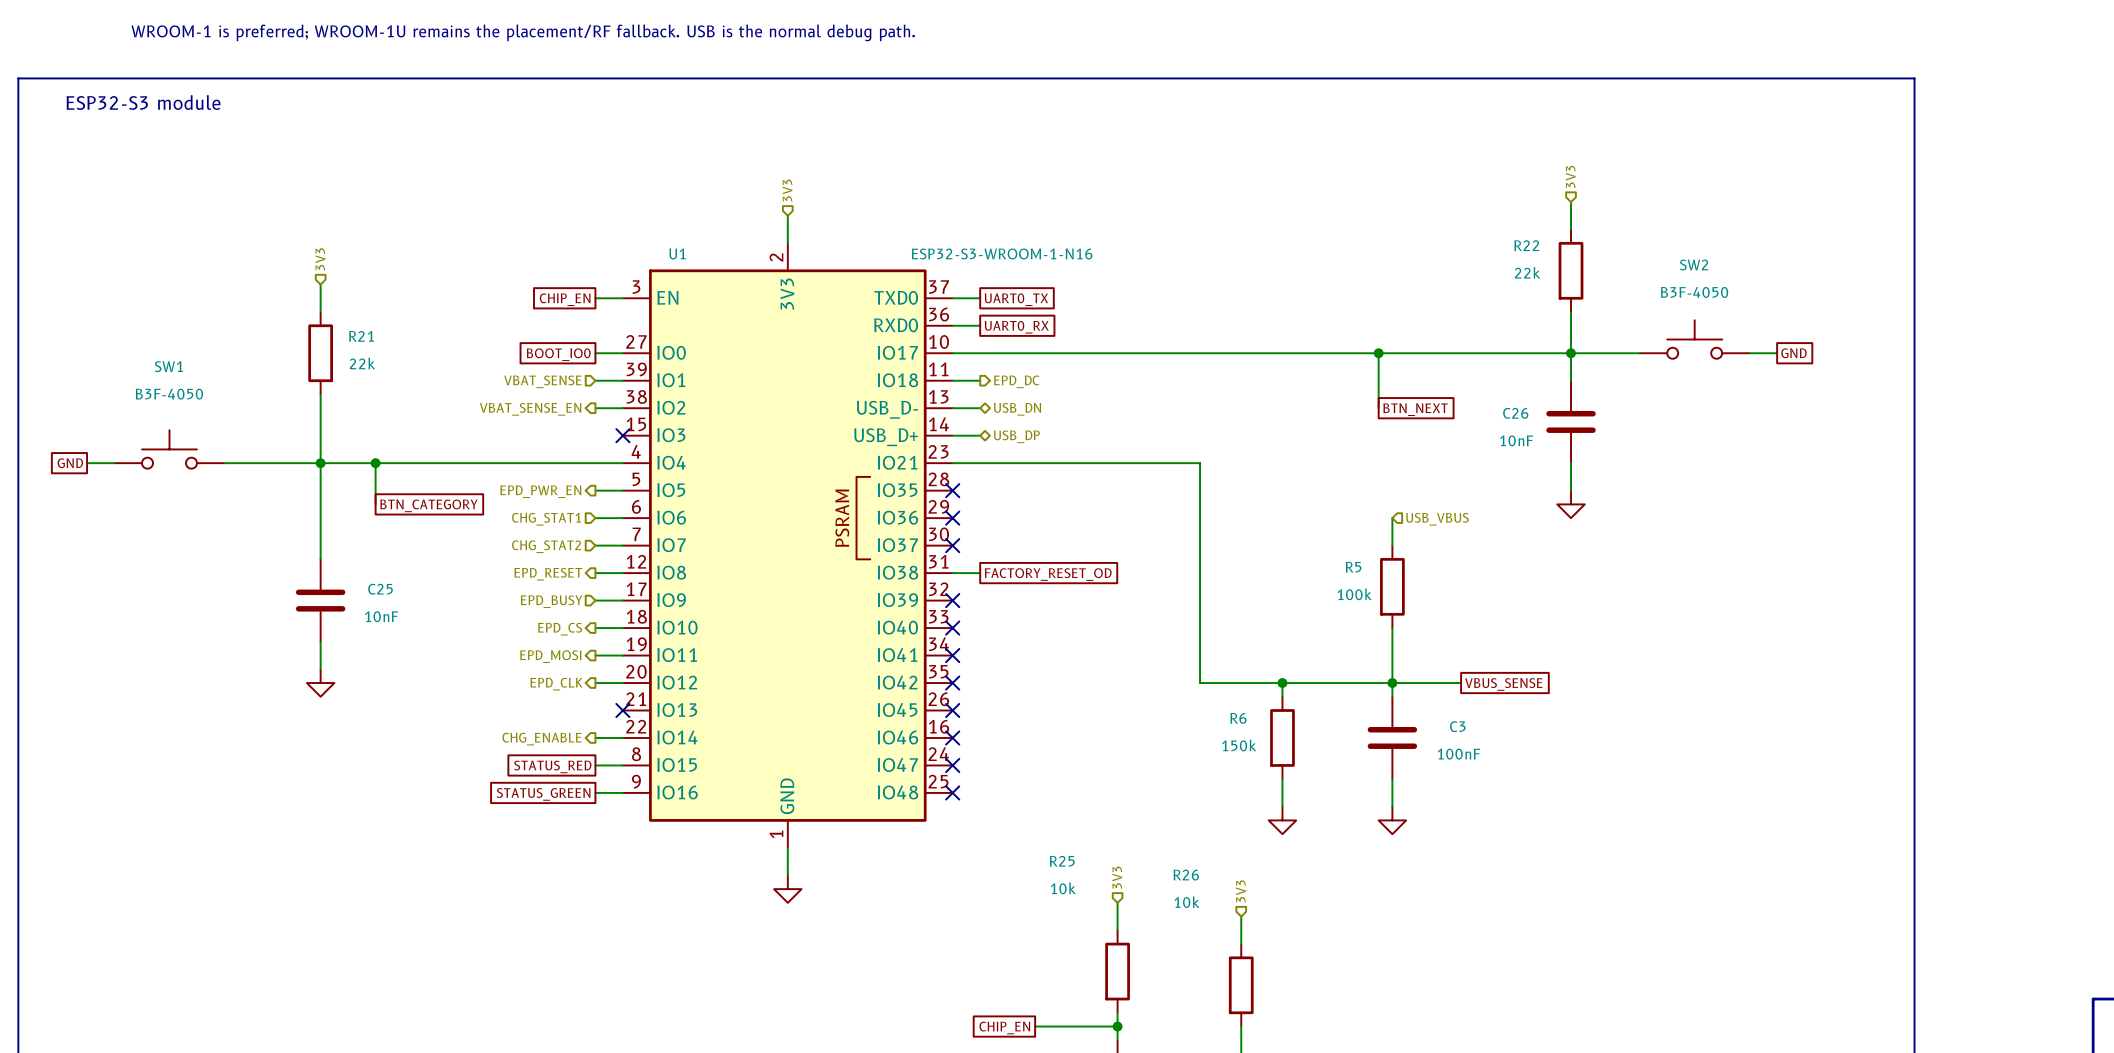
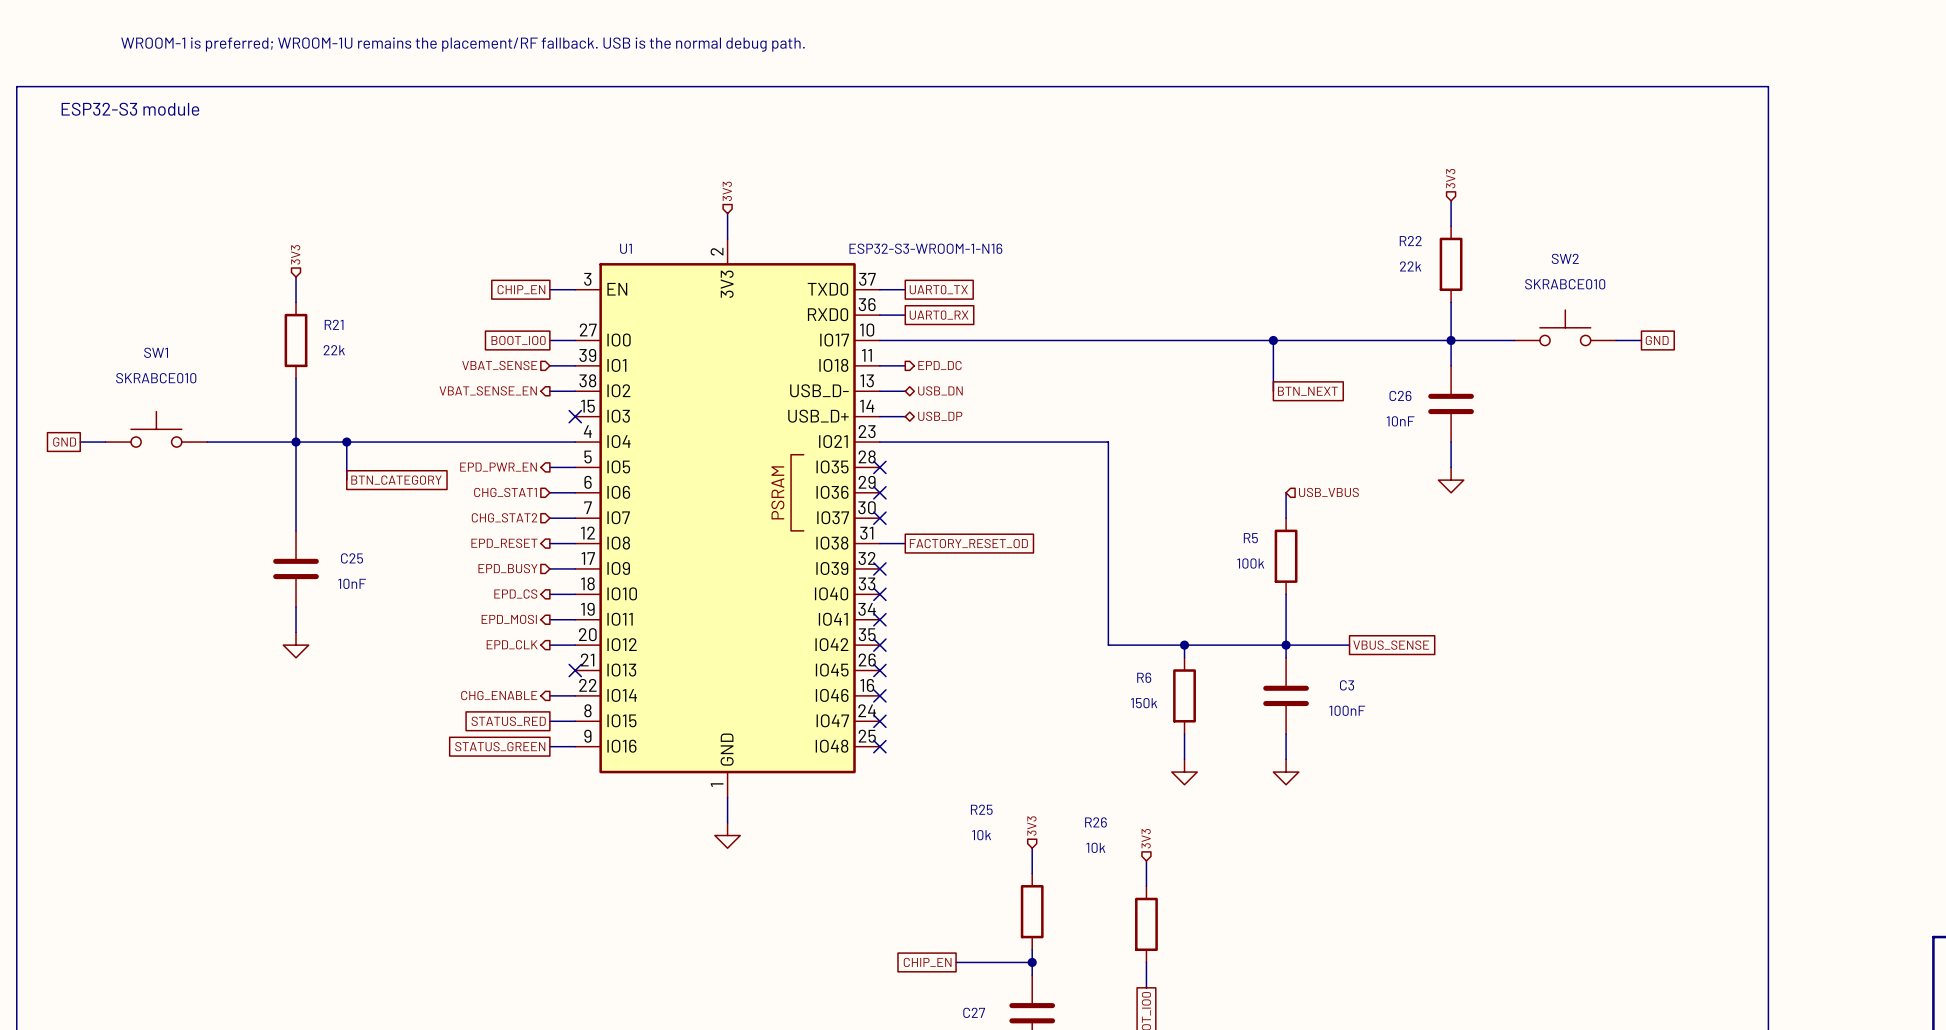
SW2 value: B3F-4050 (1694, 292) -> SKRABCE010 (1565, 284)
SW1 value: B3F-4050 (169, 394) -> SKRABCE010 (156, 378)

